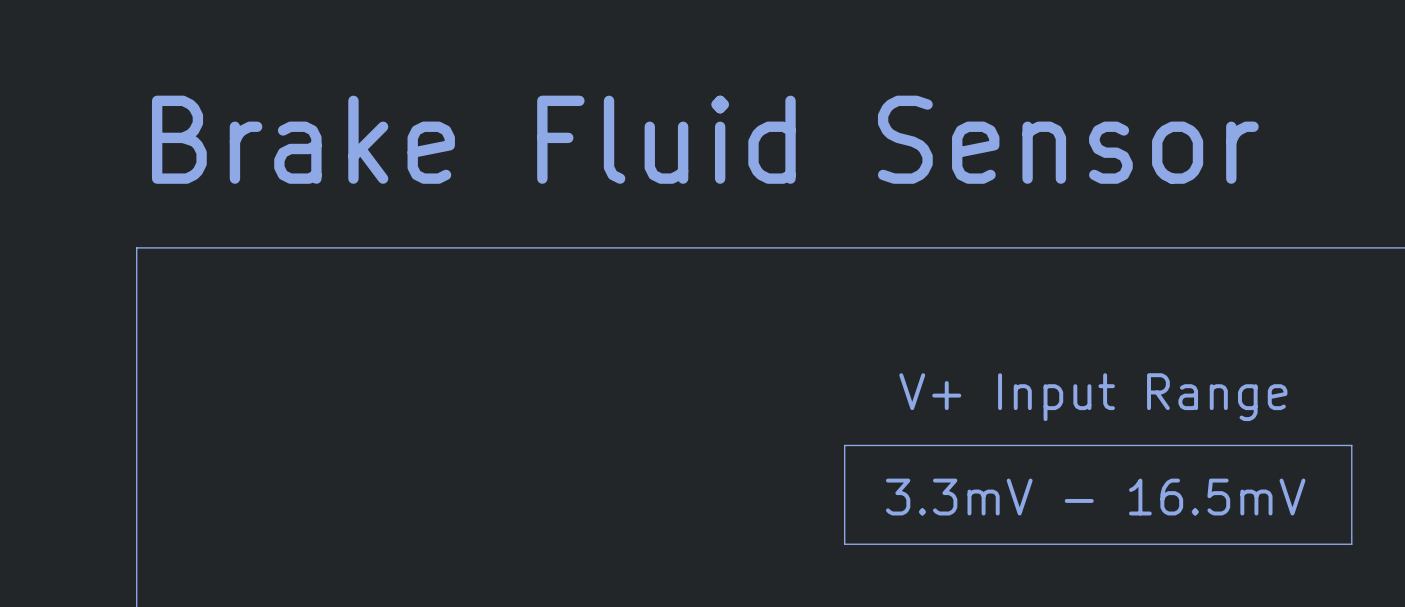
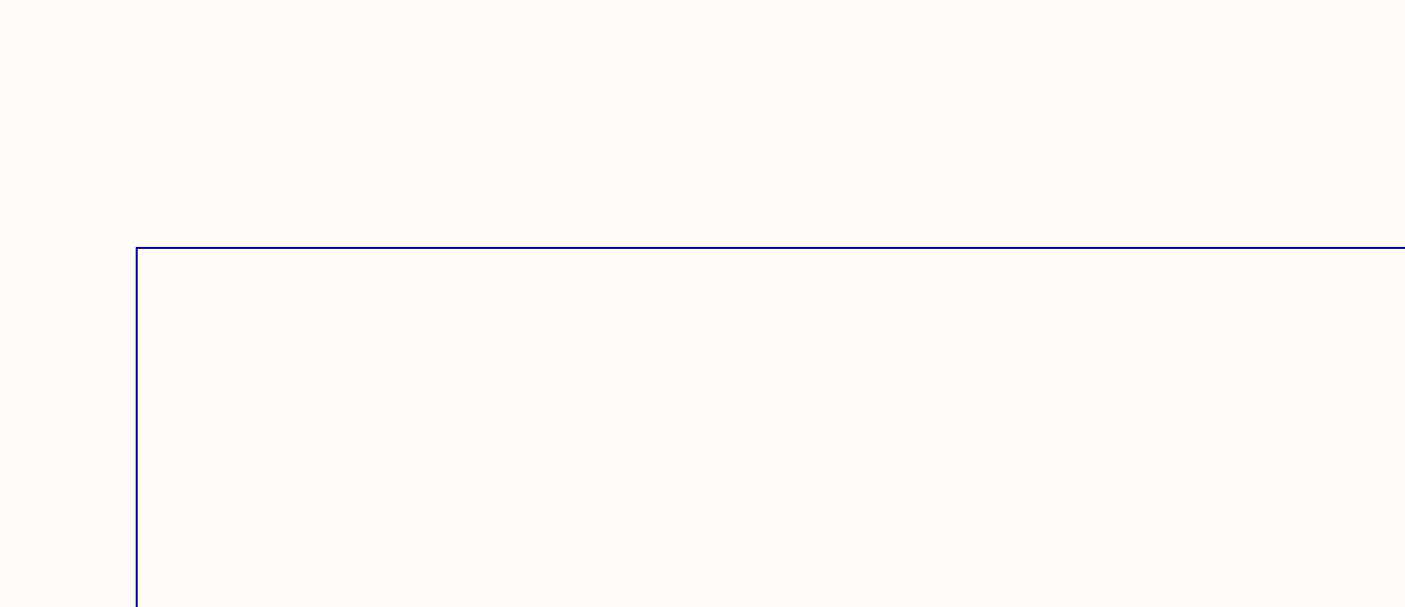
text: Brake Fluid Sensor (705, 139) -> none
text: V+ Input Range (1093, 397) -> none
line: (844, 445) (1351, 445) (1351, 544) (844, 544) (844, 445) -> none
text: 3.3mV - 16.5mV (1095, 497) -> none

